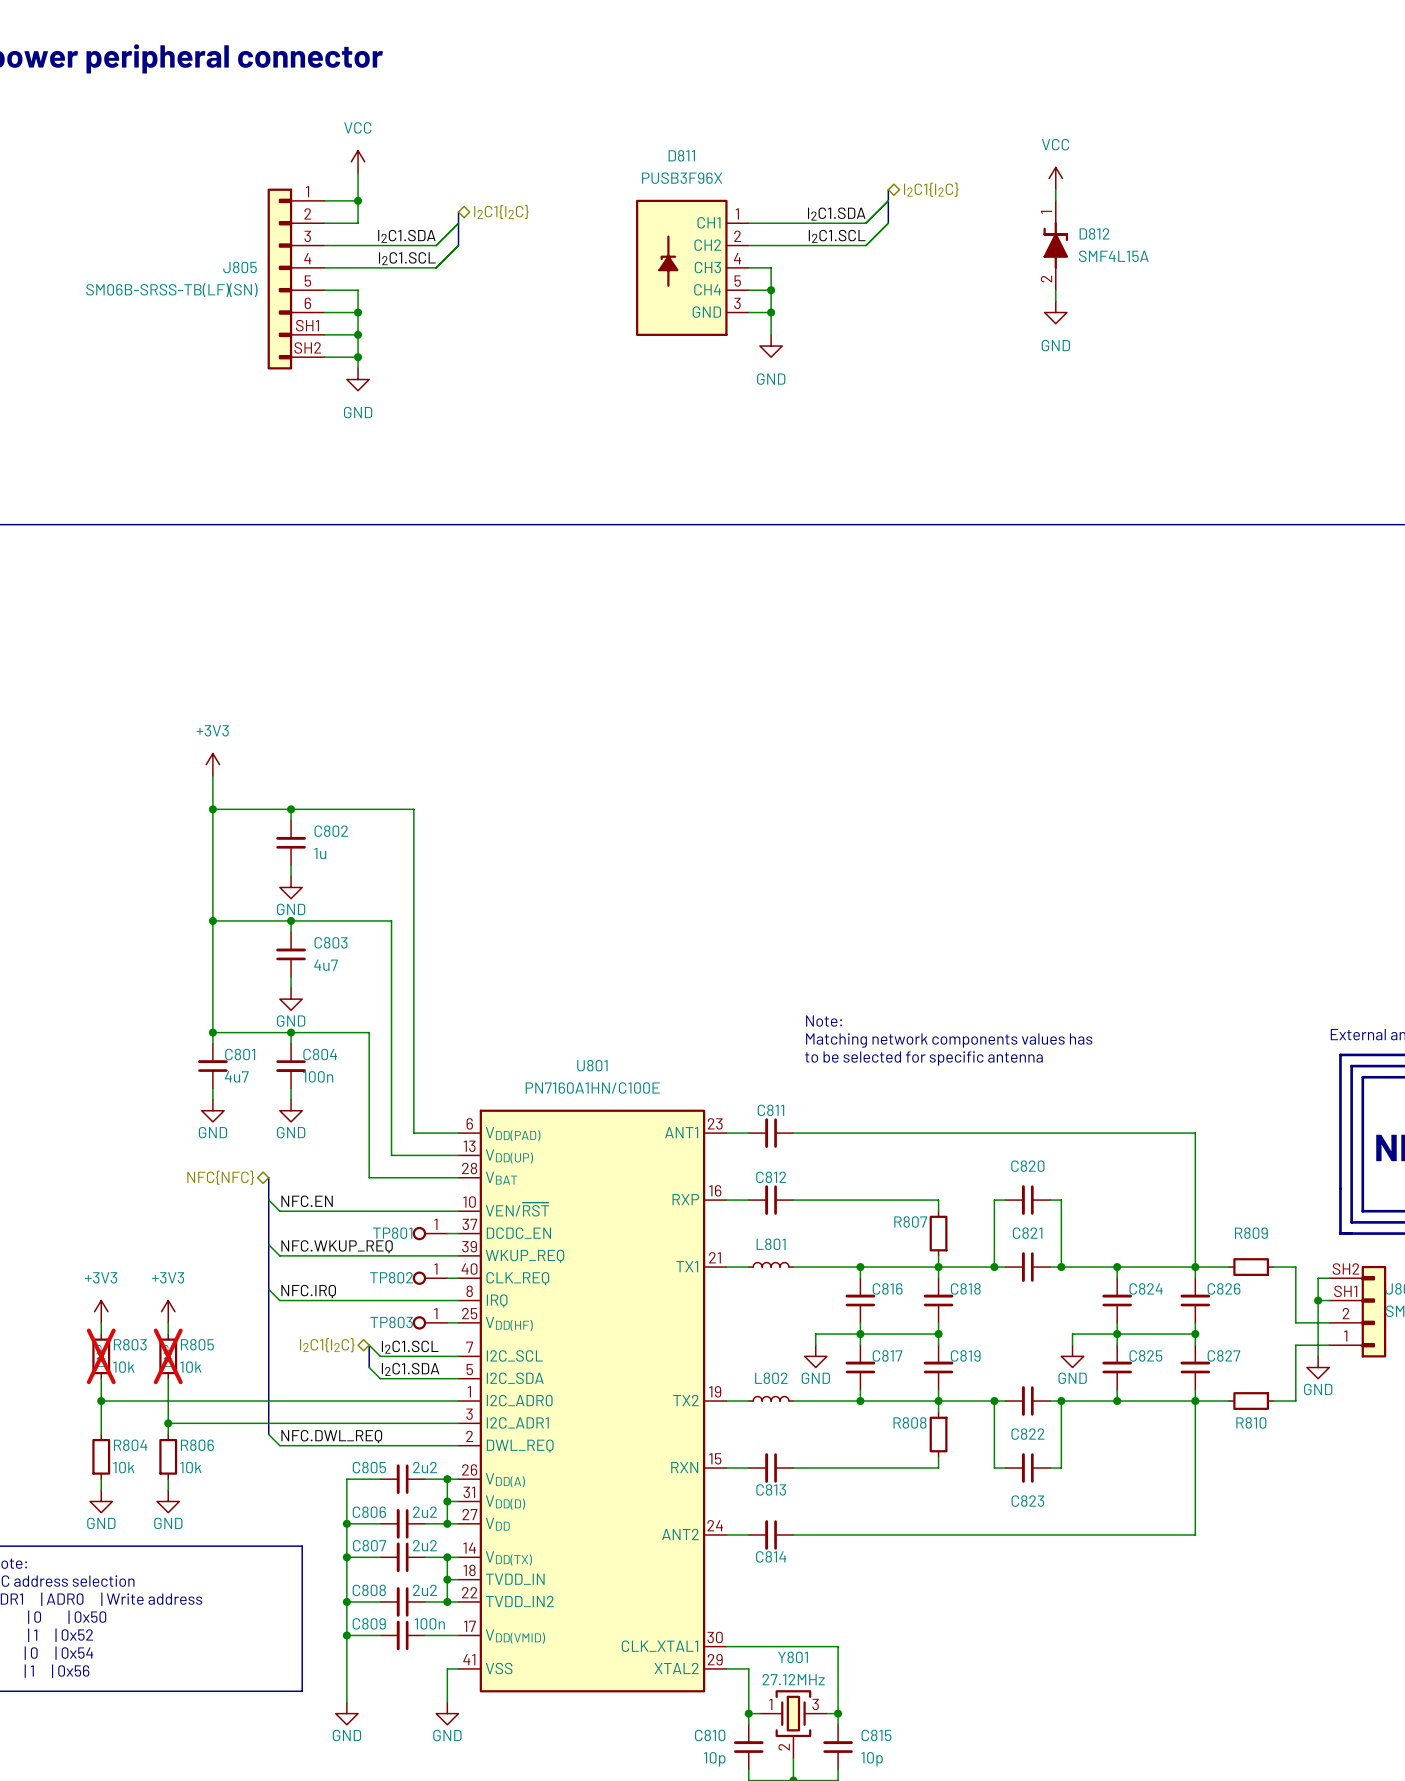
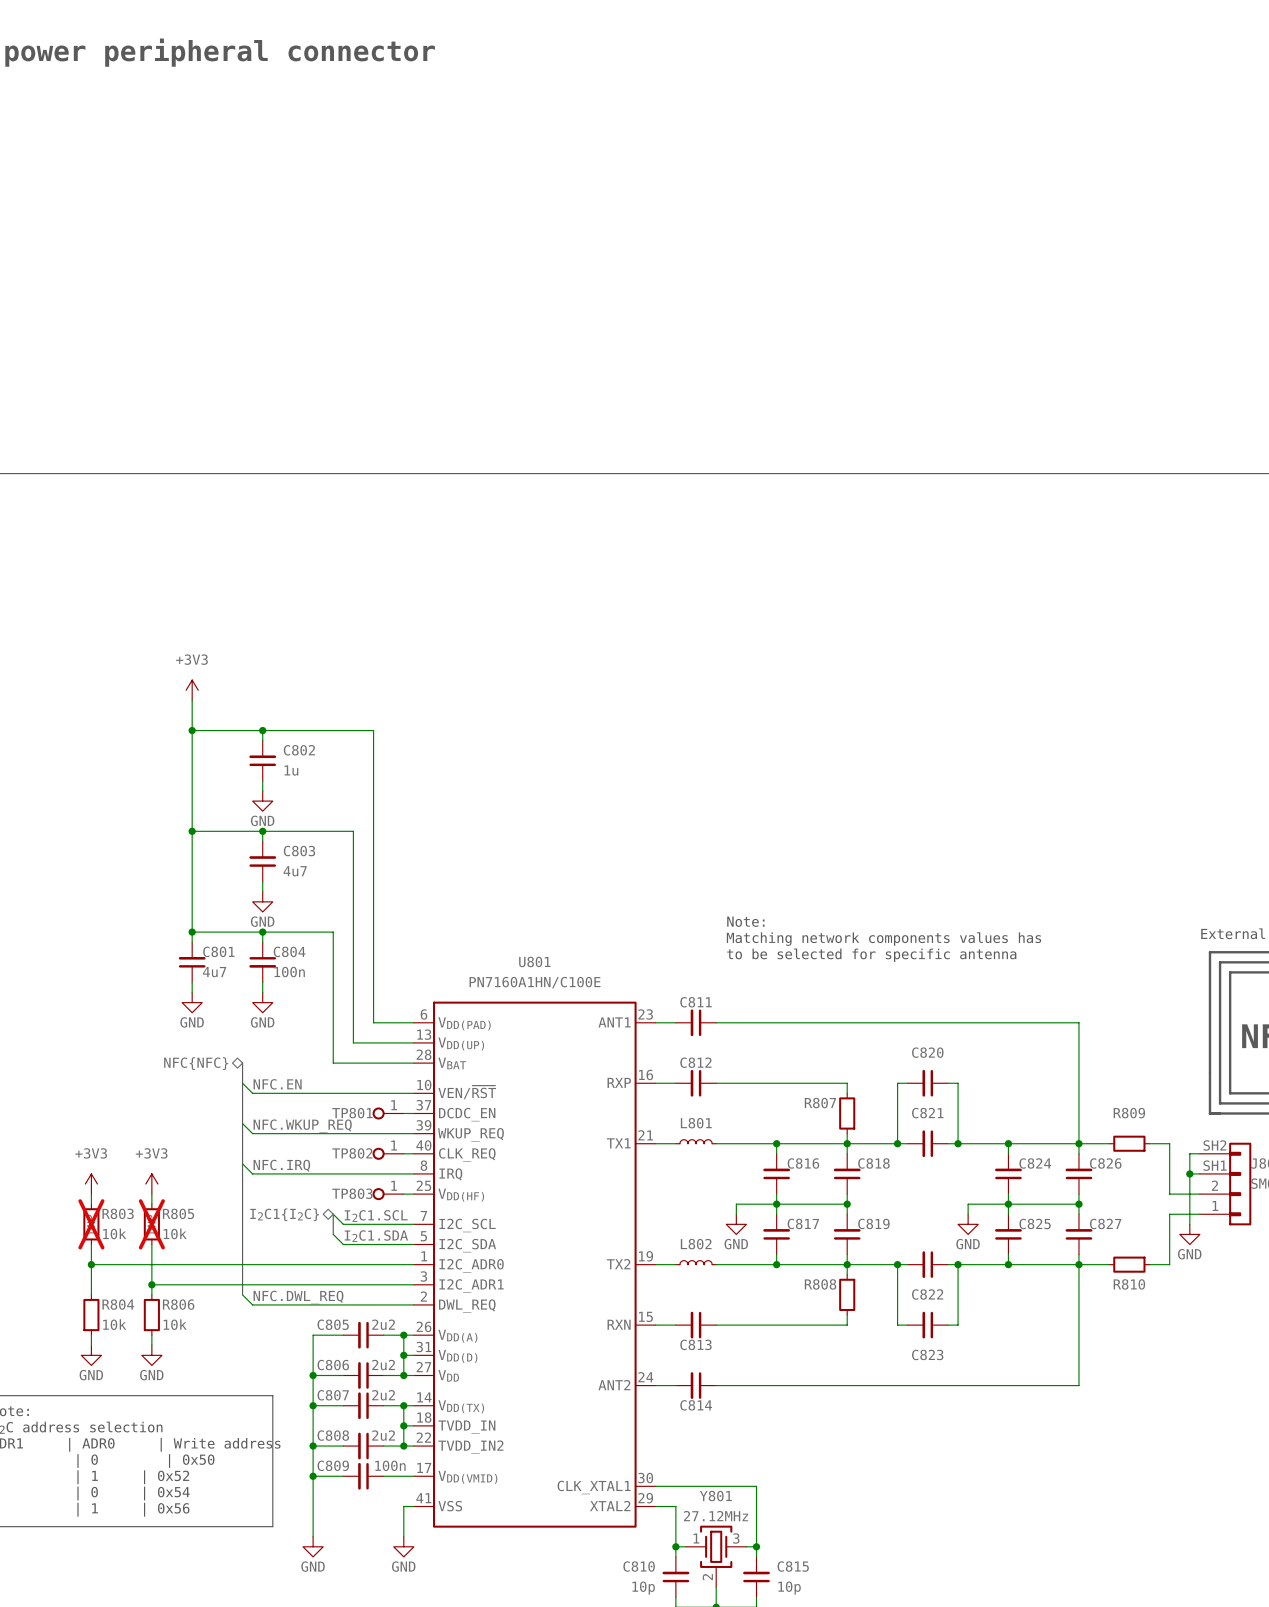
power symbol: VCC (358, 161) -> none
wire: (358, 172) (358, 223) (324, 223) -> none
power symbol: VCC (1055, 178) -> none
bus: (888, 189) (888, 223) -> none
hierarchical label: I2C1{I2C} (931, 189) -> none
wire: (1055, 189) (1055, 200) -> none
wire: (324, 200) (358, 200) -> none
junction: (358, 200) -> none
wire: (888, 200) (865, 223) (748, 223) -> none
bus: (458, 212) (458, 245) -> none
hierarchical label: I2C1{I2C} (501, 212) -> none
label: I2C1.SDA (836, 214) -> none
wire: (458, 223) (436, 245) (324, 245) -> none
wire: (888, 223) (865, 245) (748, 245) -> none
label: I2C1.SDA (406, 236) -> none
label: I2C1.SCL (837, 236) -> none
wire: (458, 245) (436, 267) (324, 267) -> none
D812: (1055, 245) -> none
label: I2C1.SCL (407, 258) -> none
D811: (692, 267) -> none
wire: (748, 267) (771, 267) (771, 334) -> none
J805: (296, 279) -> none
wire: (324, 290) (358, 290) (358, 368) -> none
wire: (748, 290) (771, 290) -> none
junction: (771, 290) -> none
wire: (1055, 290) (1055, 301) -> none
wire: (324, 312) (358, 312) -> none
junction: (358, 312) -> none
wire: (748, 312) (771, 312) -> none
junction: (771, 312) -> none
power symbol: GND (1055, 312) -> none
wire: (324, 334) (358, 334) -> none
junction: (358, 334) -> none
power symbol: GND (771, 346) -> none
wire: (324, 357) (358, 357) -> none
junction: (358, 357) -> none
power symbol: GND (358, 379) -> none

